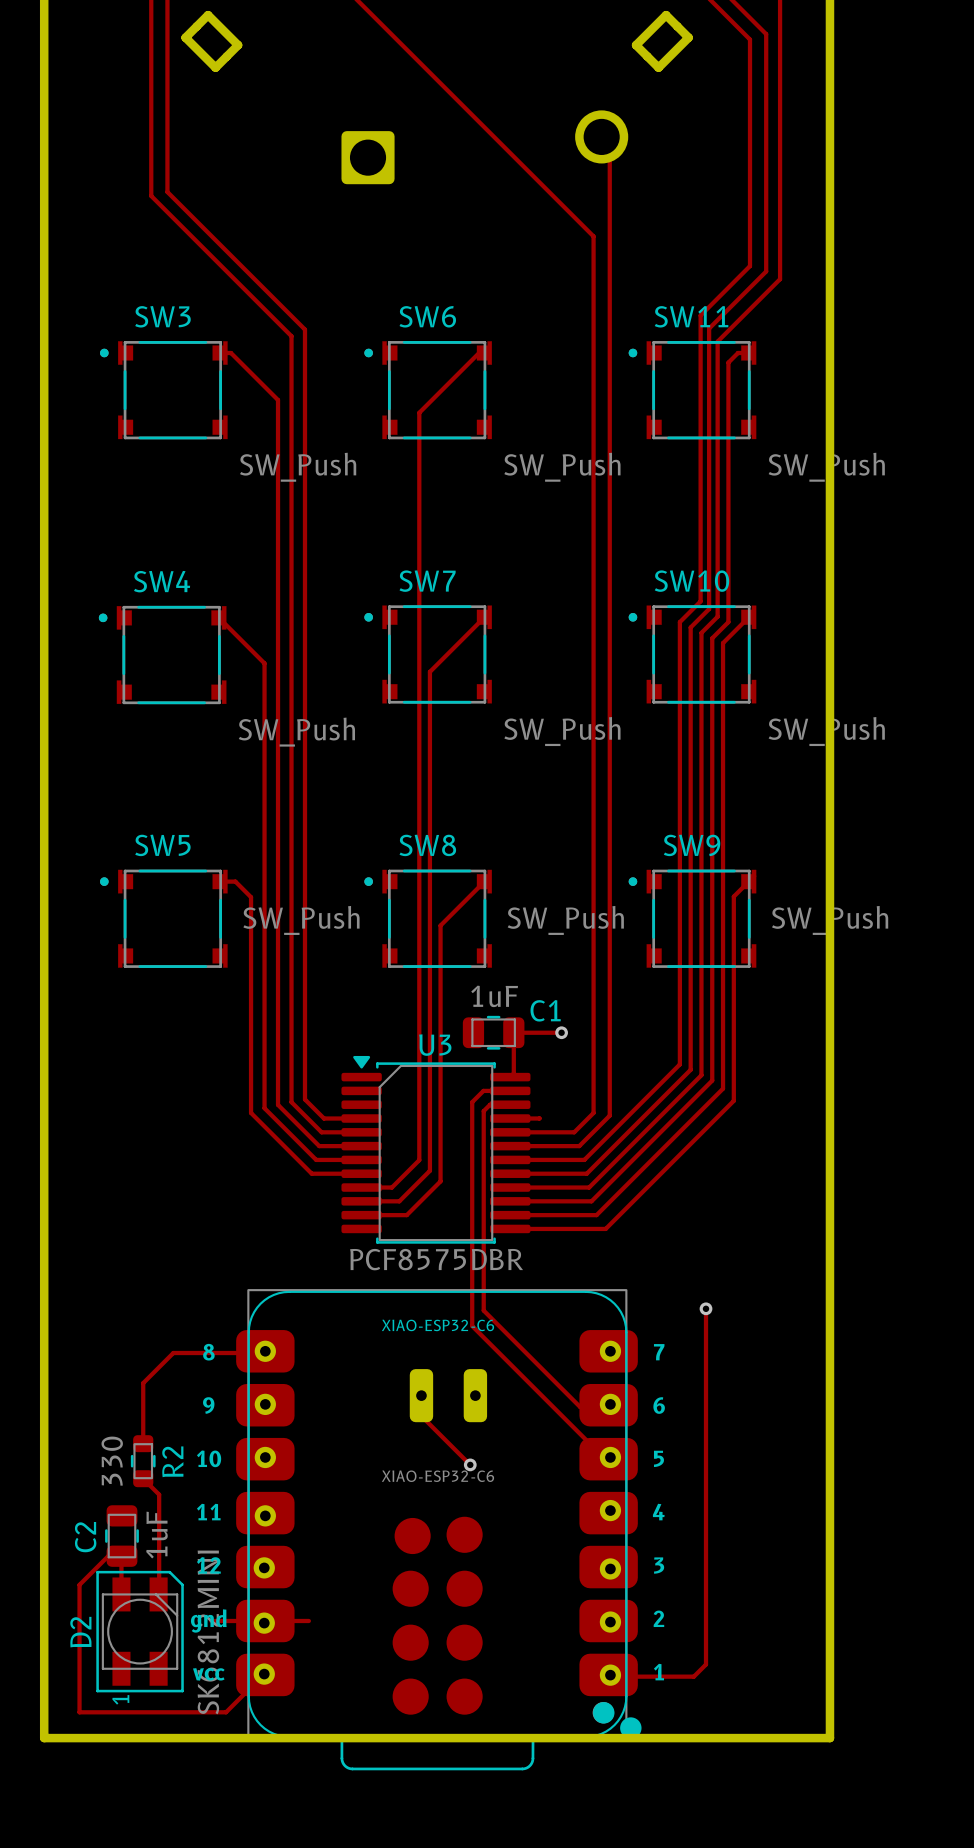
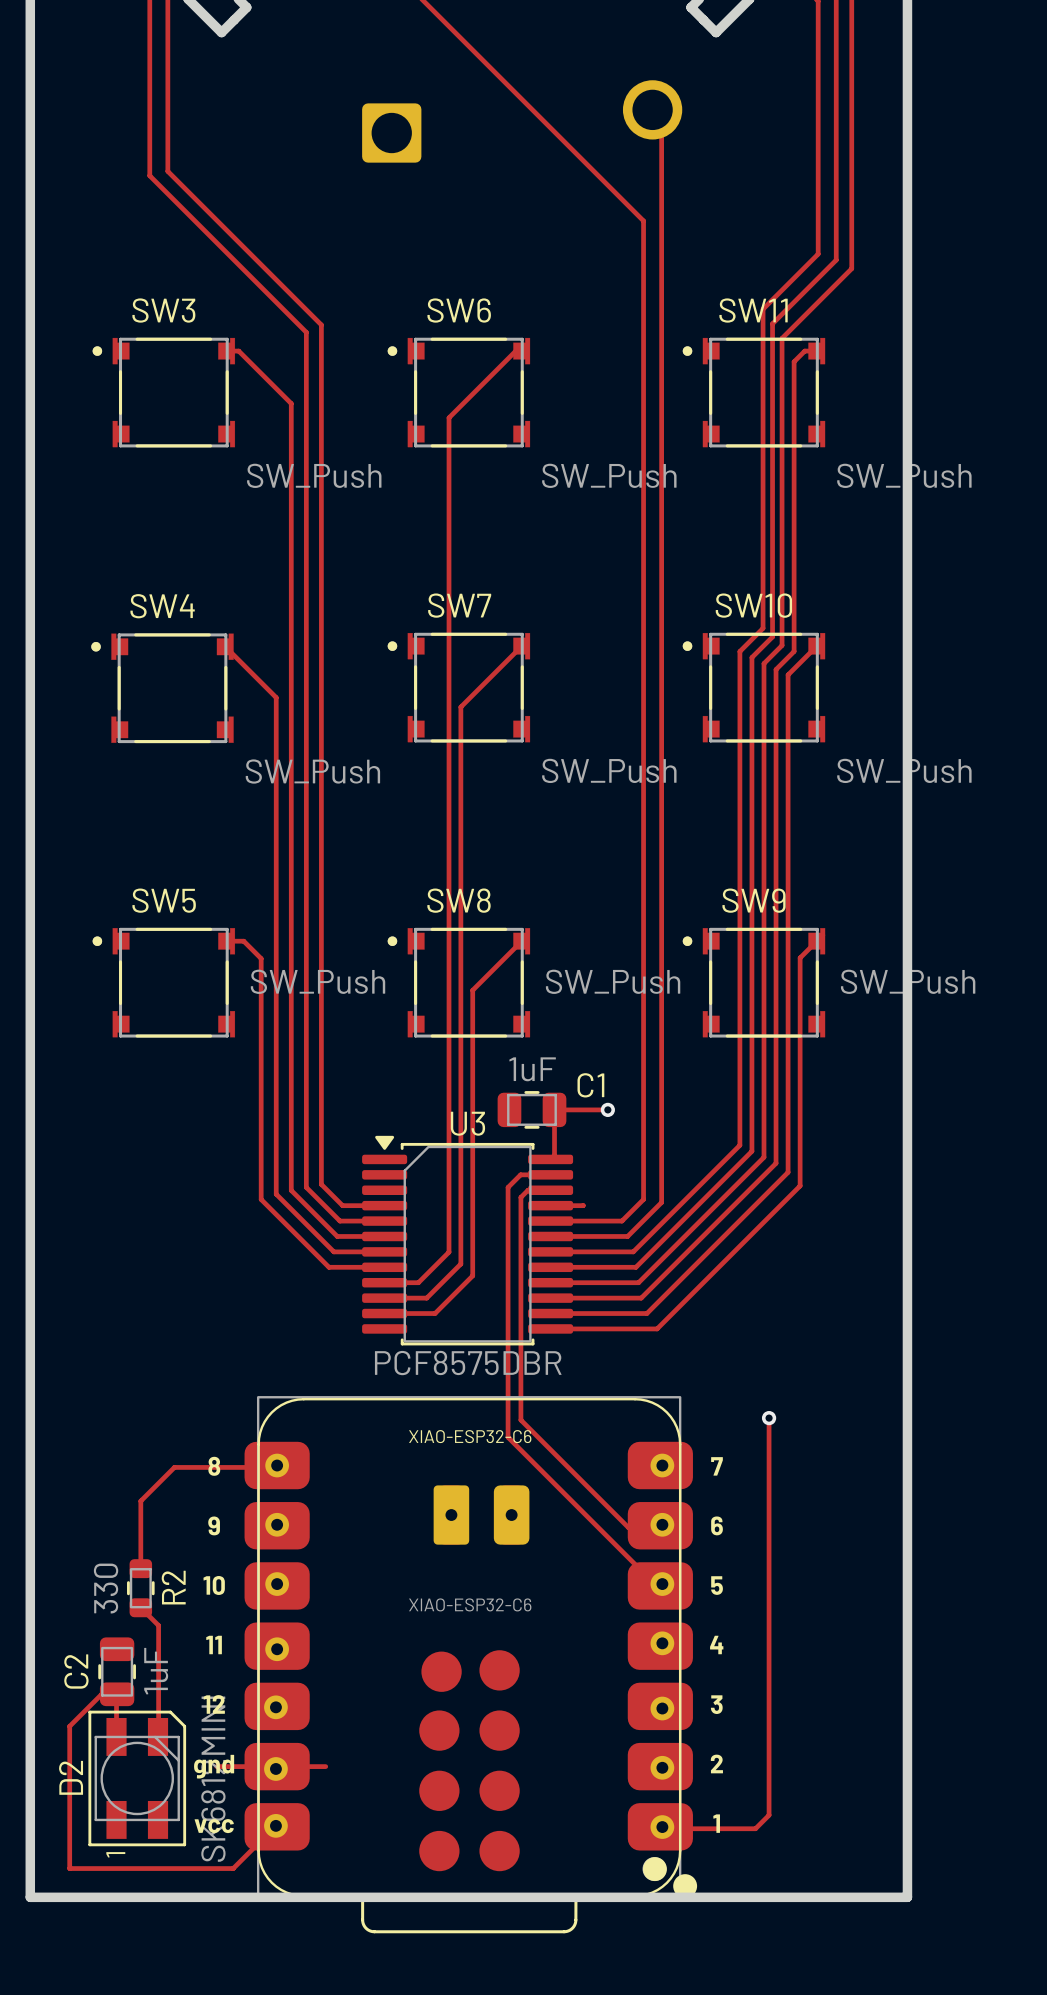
part footprint: [236, 1289, 642, 1771] -> [244, 1396, 698, 1934]
track: (421, 1395) (421, 1416) (470, 1464) -> none
part: none -> (481, 1515)
via: (470, 1464) -> none

